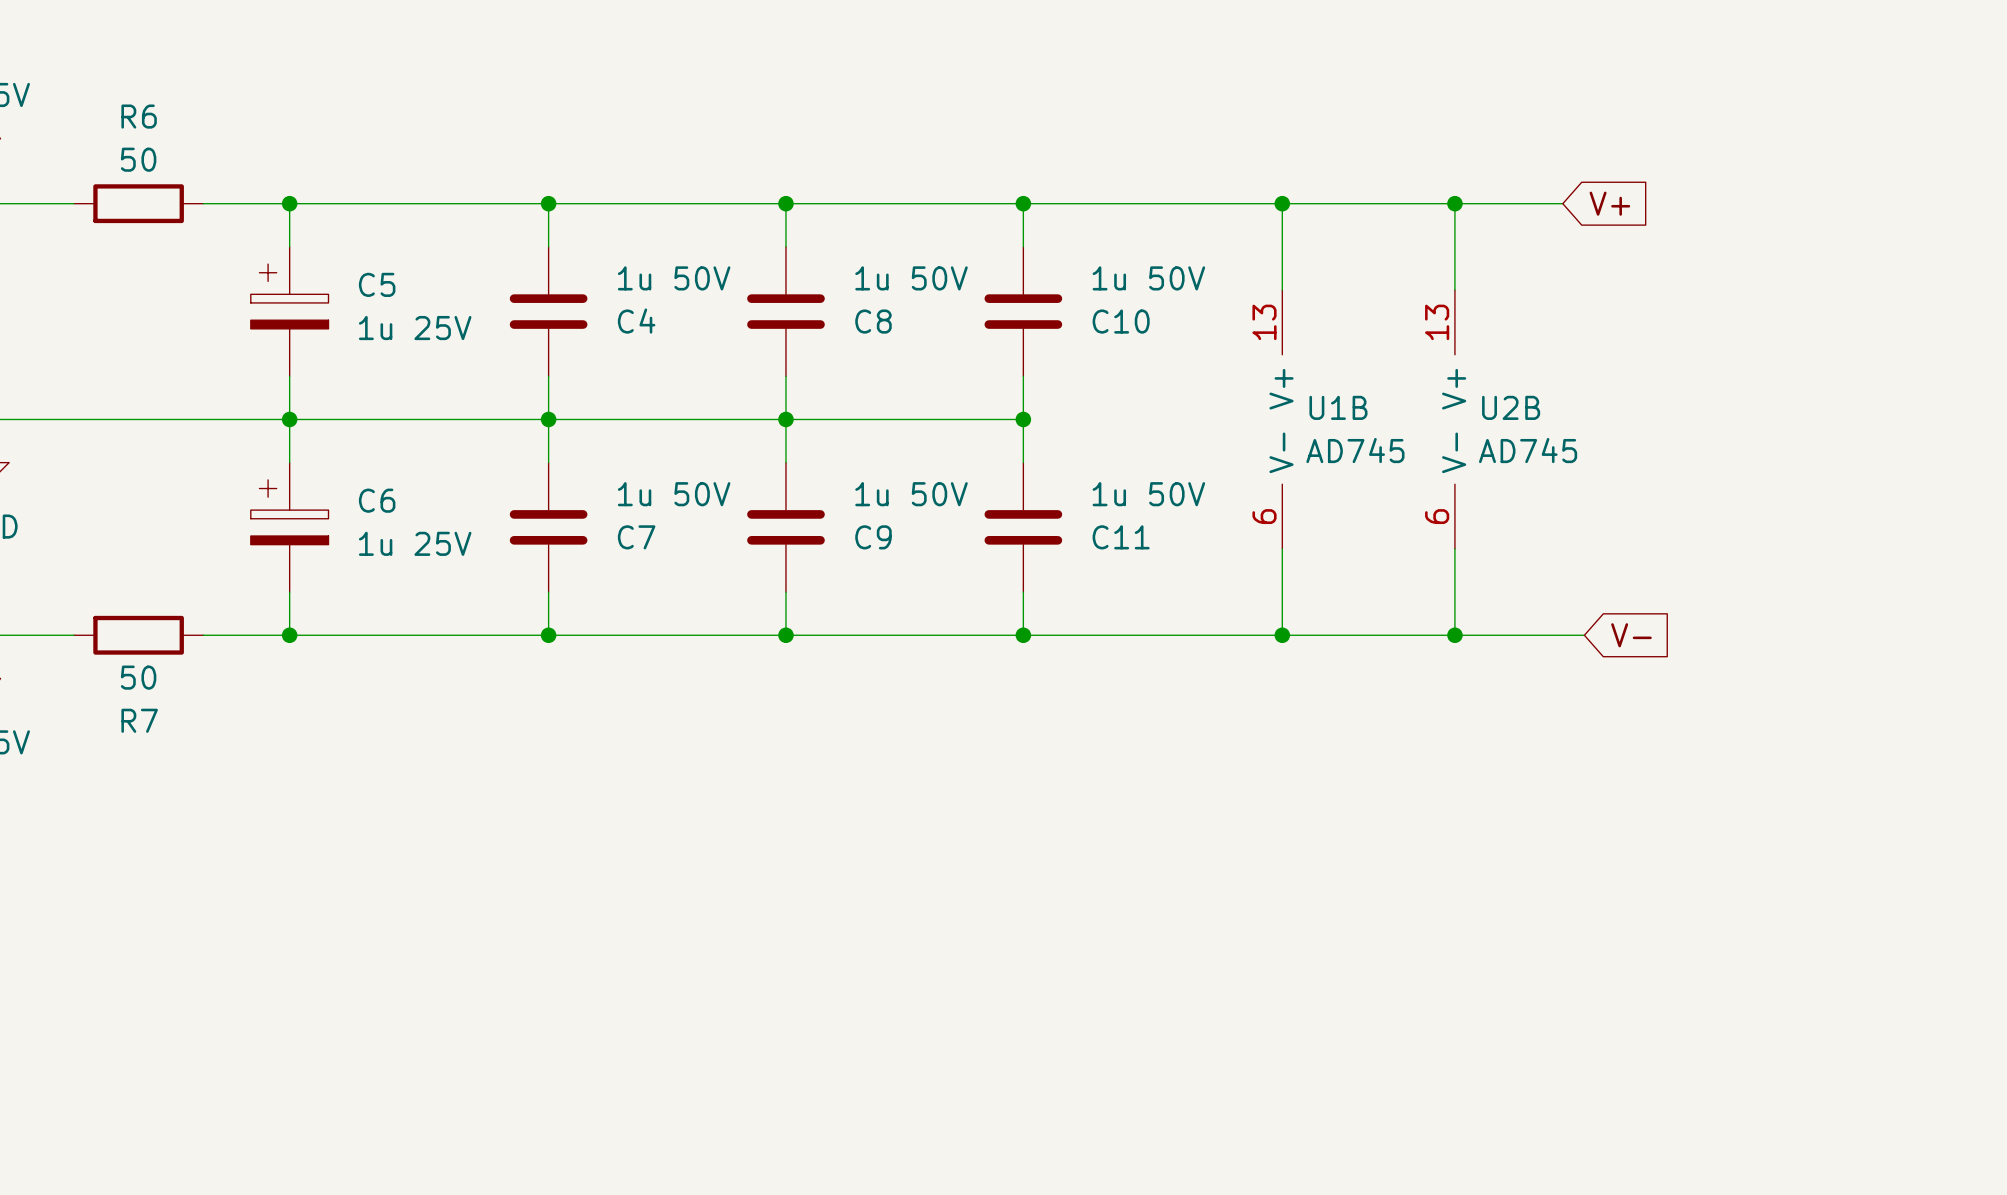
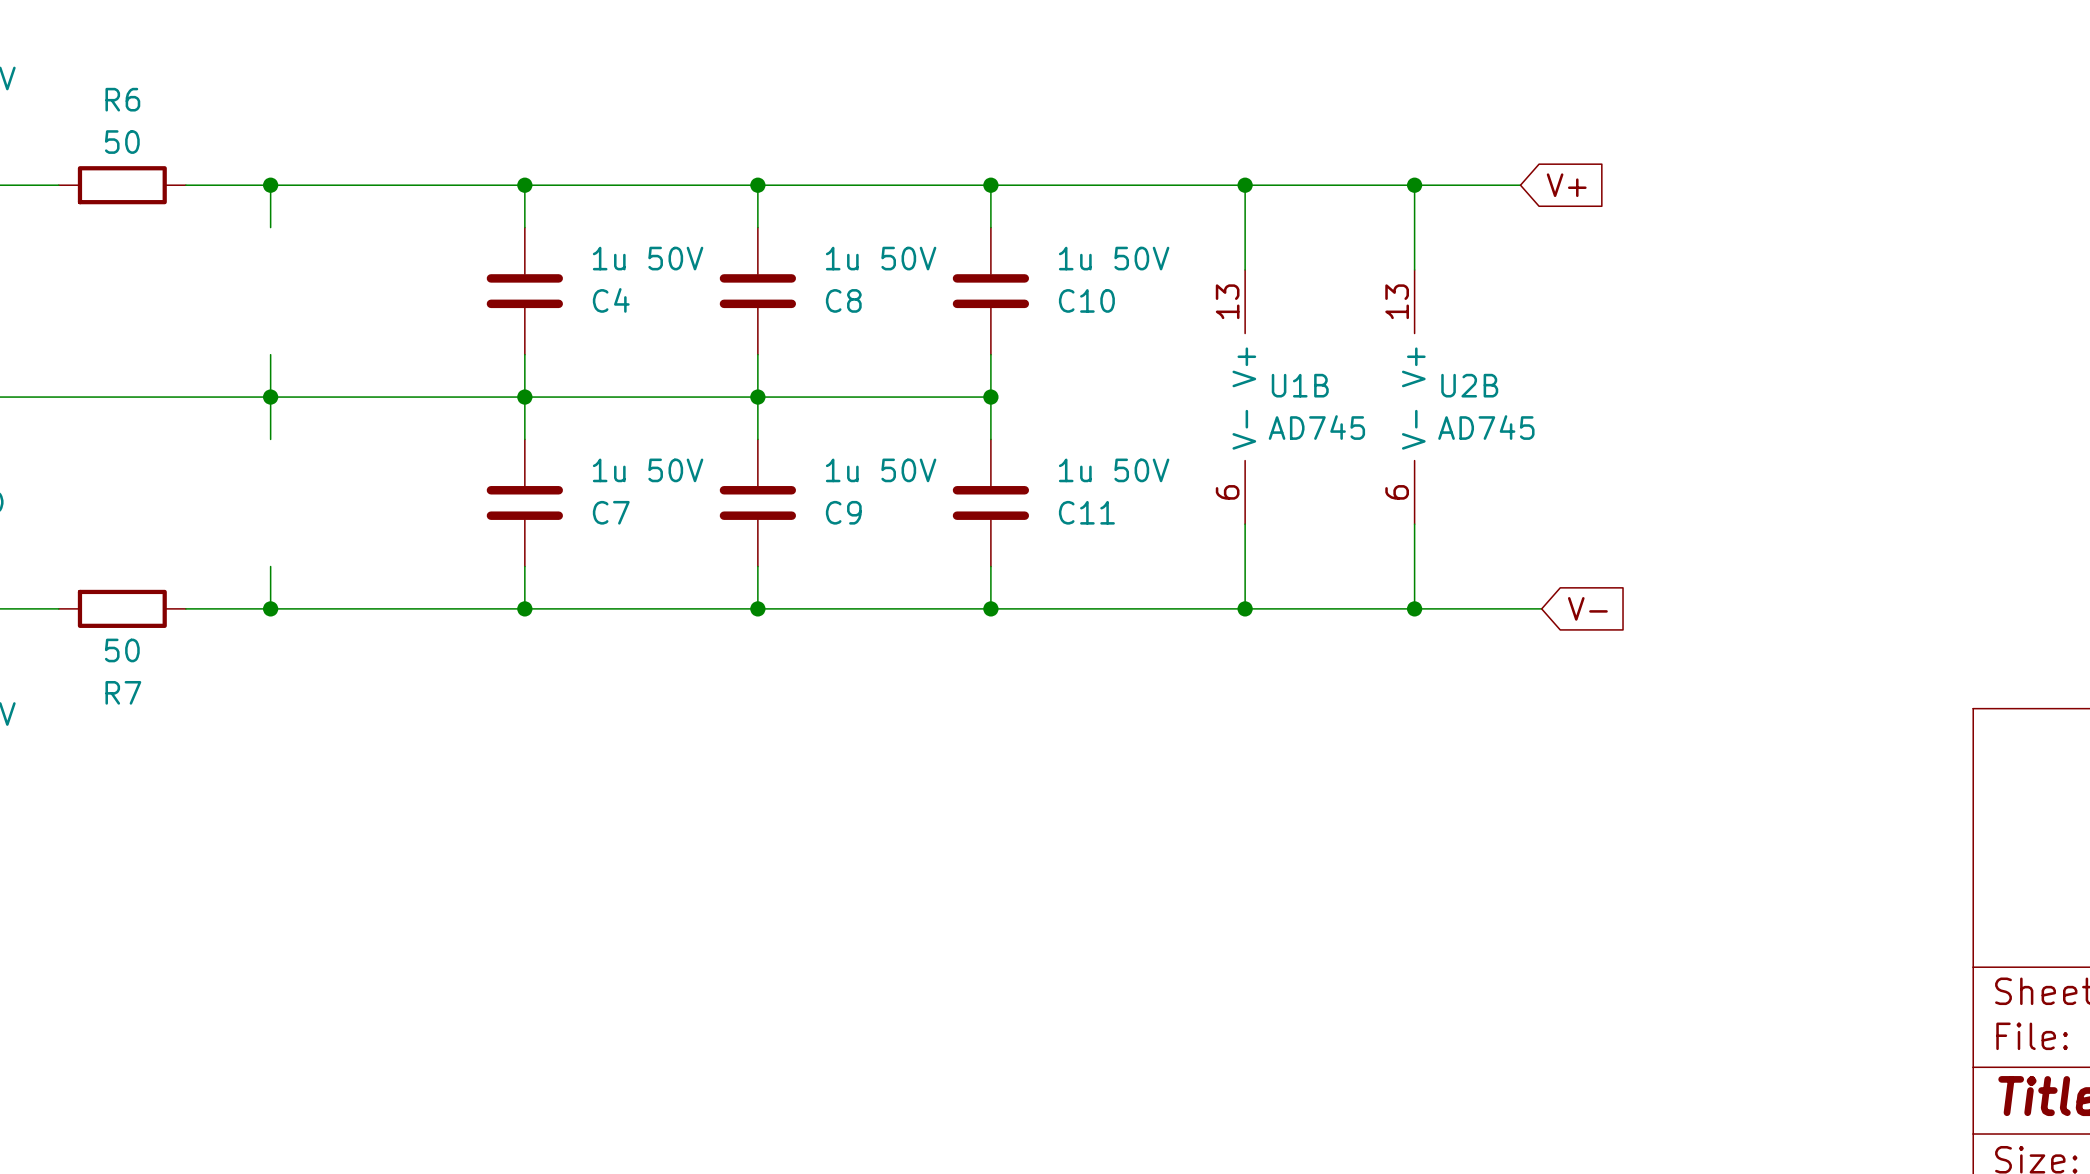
C5: 1u 25V (289, 311) -> none
C6: 1u 25V (289, 527) -> none

